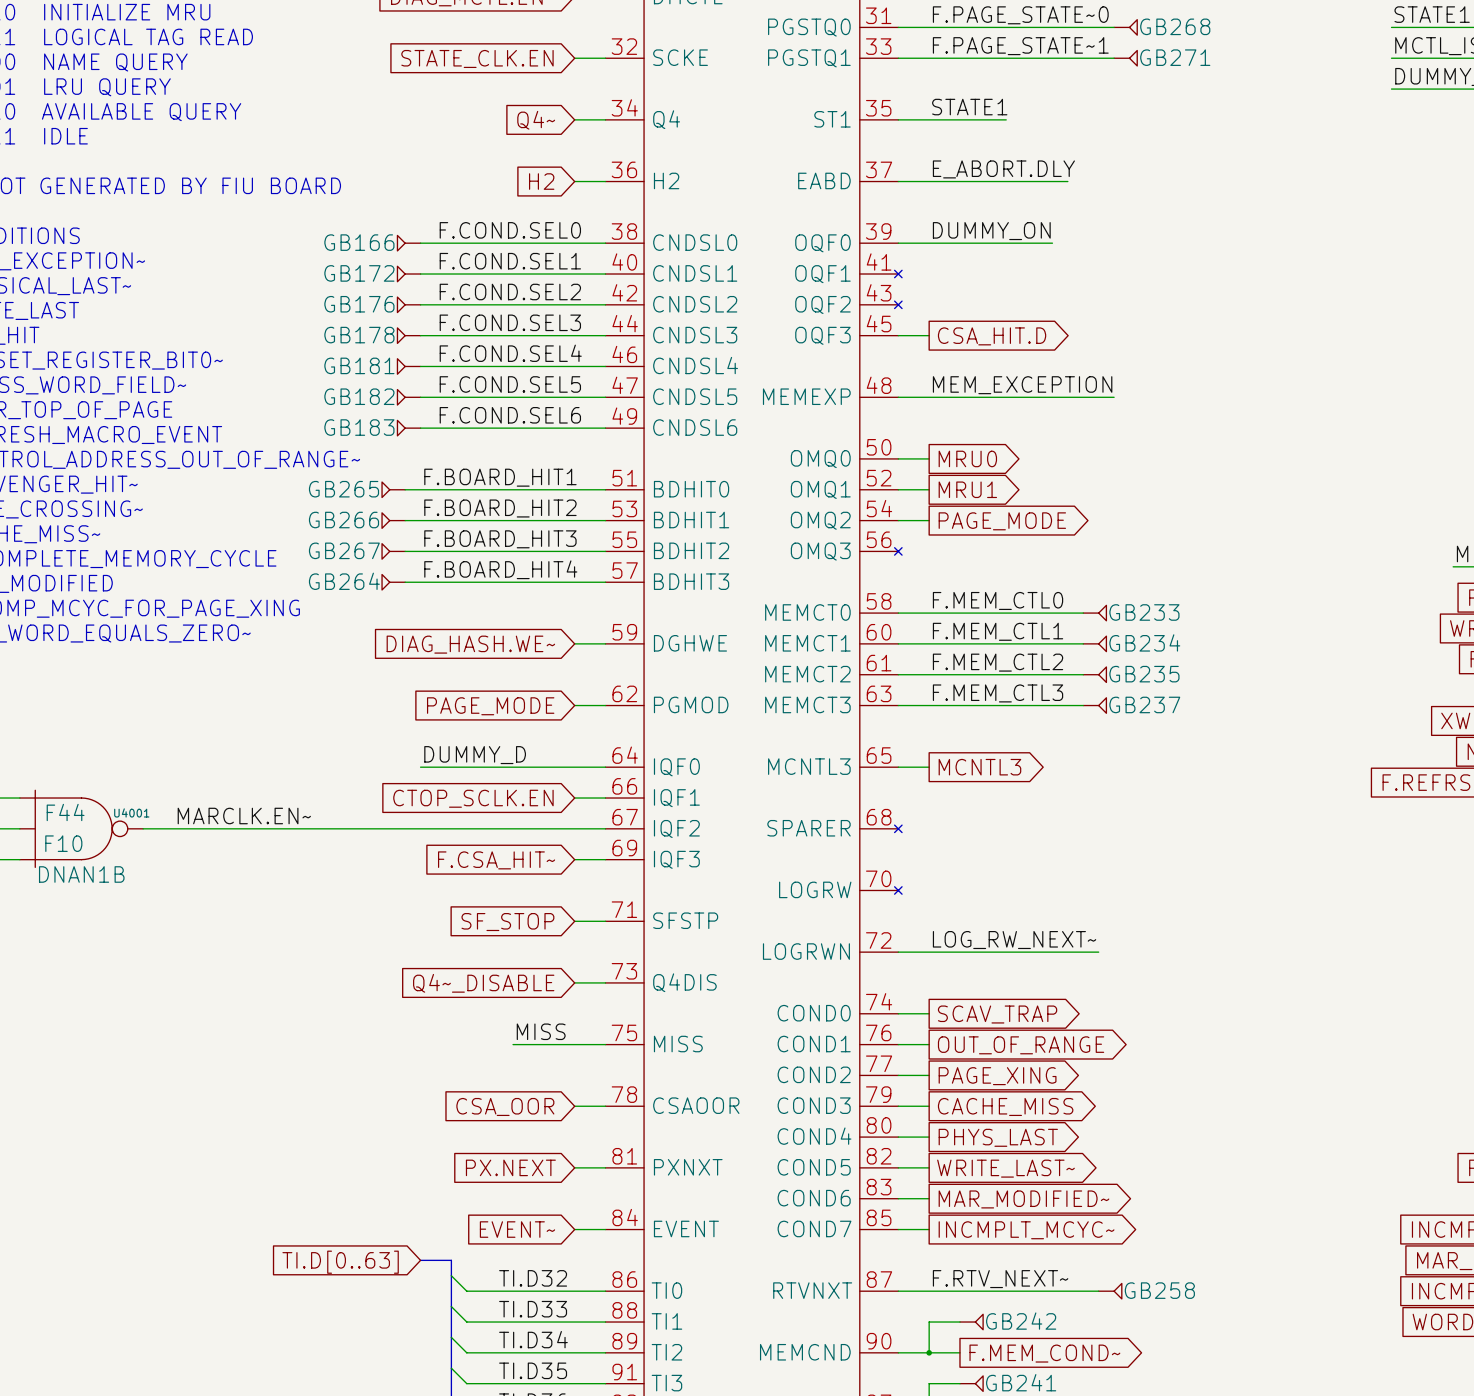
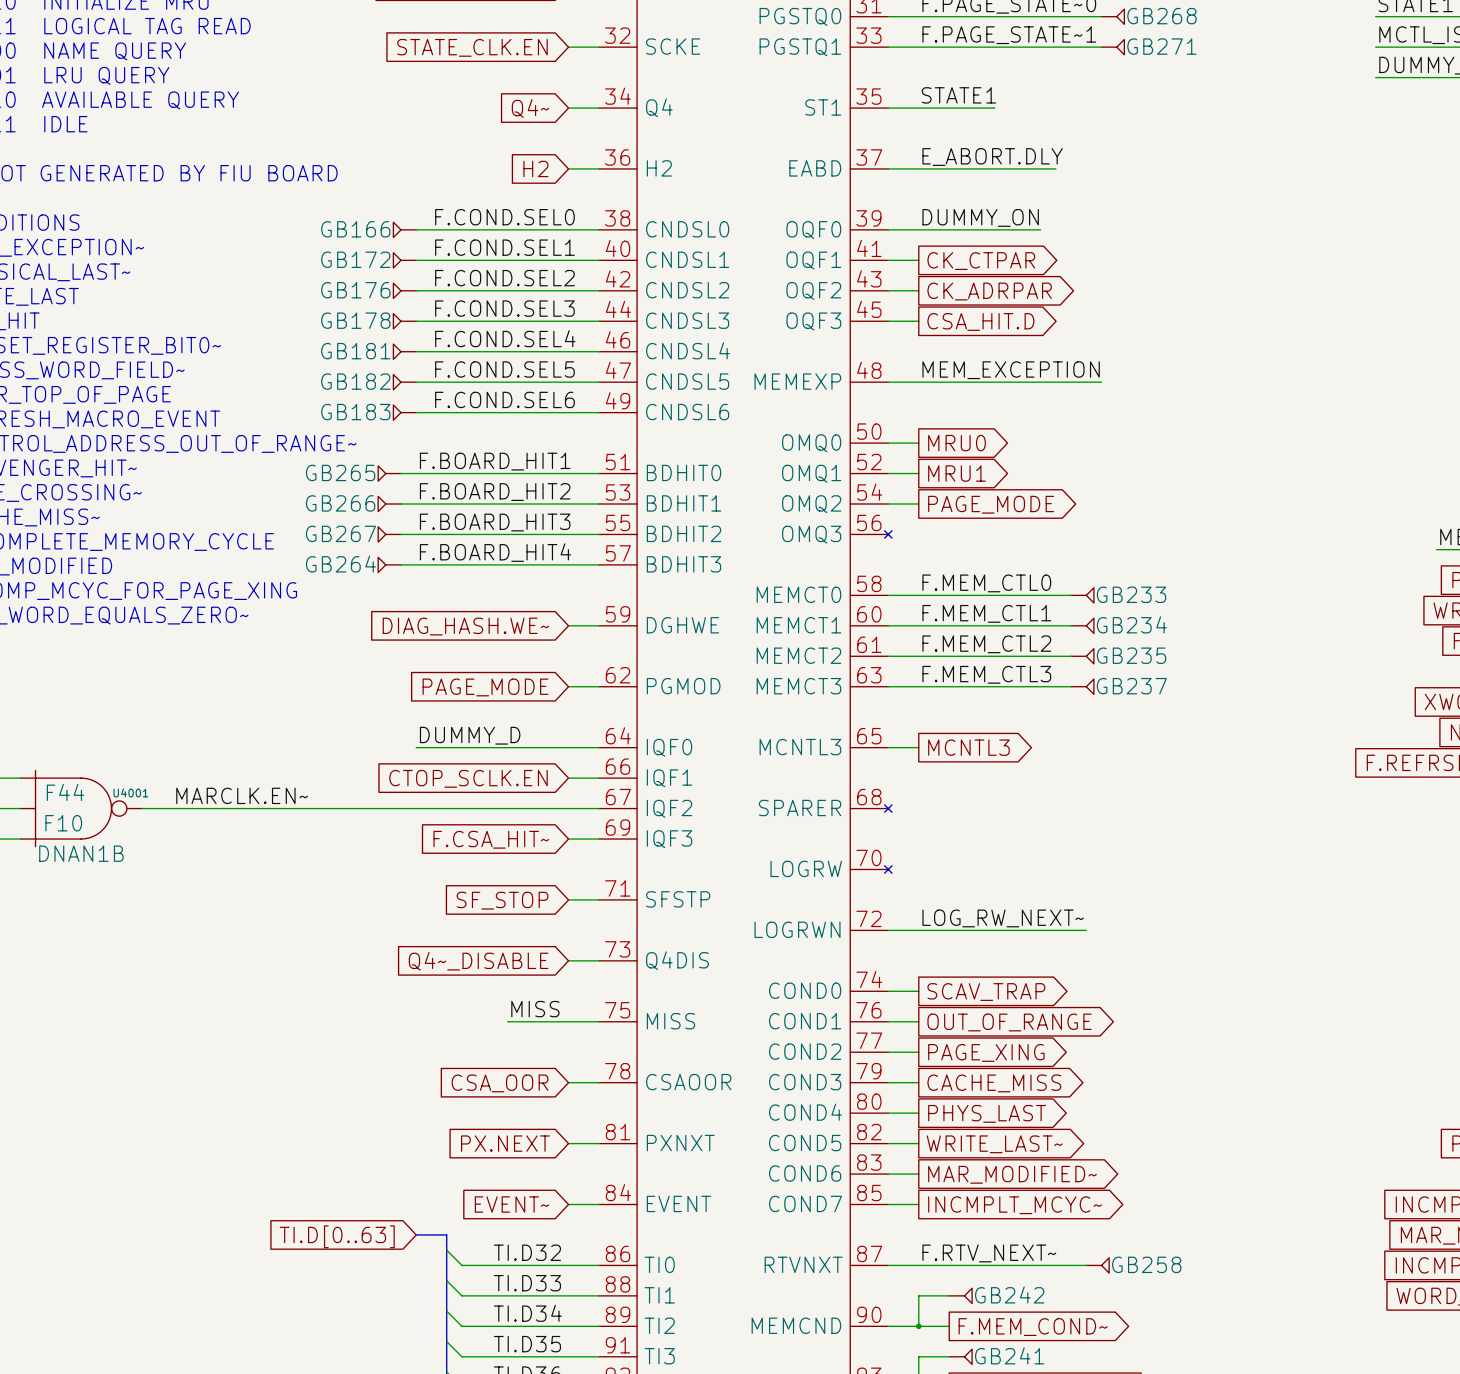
wire: none -> (888, 260) (918, 260)
no-connect mark: (898, 274) -> none
global label: none -> CK_CTPAR (981, 261)
wire: none -> (888, 290) (918, 290)
no-connect mark: (898, 304) -> none
global label: none -> CK_ADRPAR (989, 291)

